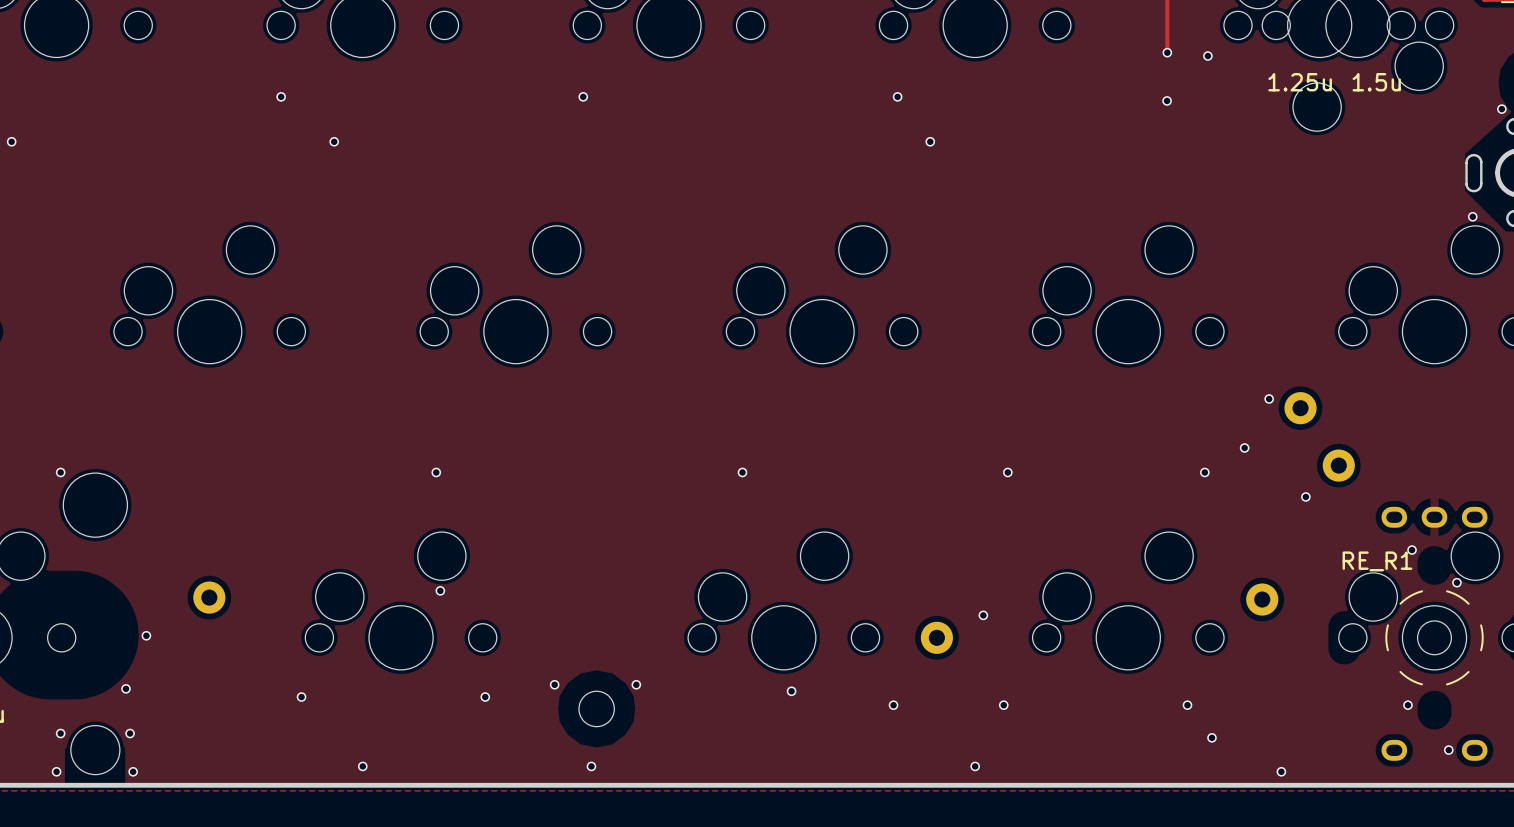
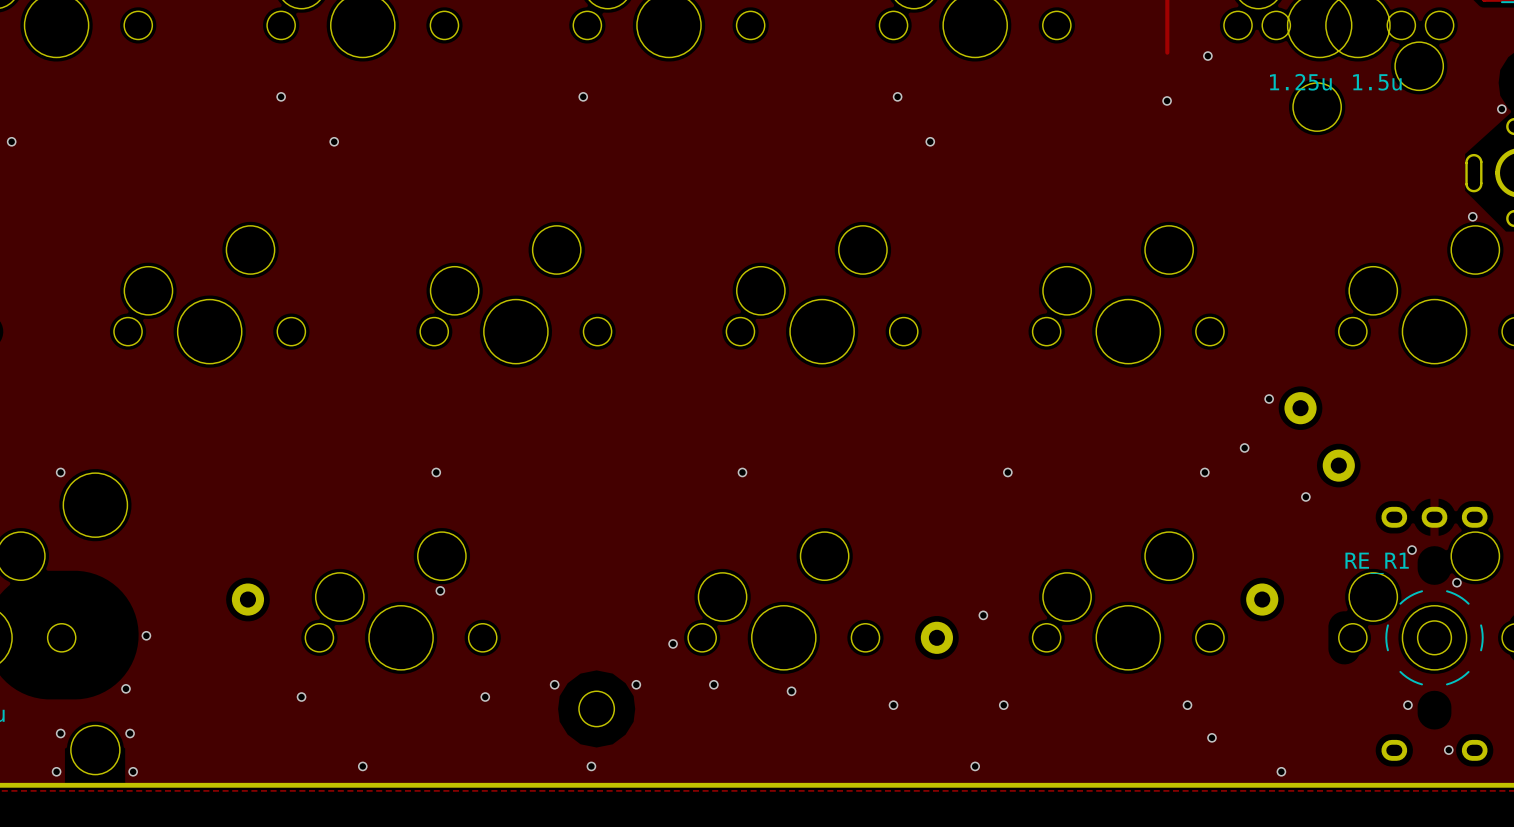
via: (1167, 52) -> none
part position: (209, 597) -> (247, 599)
via: none -> (673, 643)
via: none -> (713, 684)

